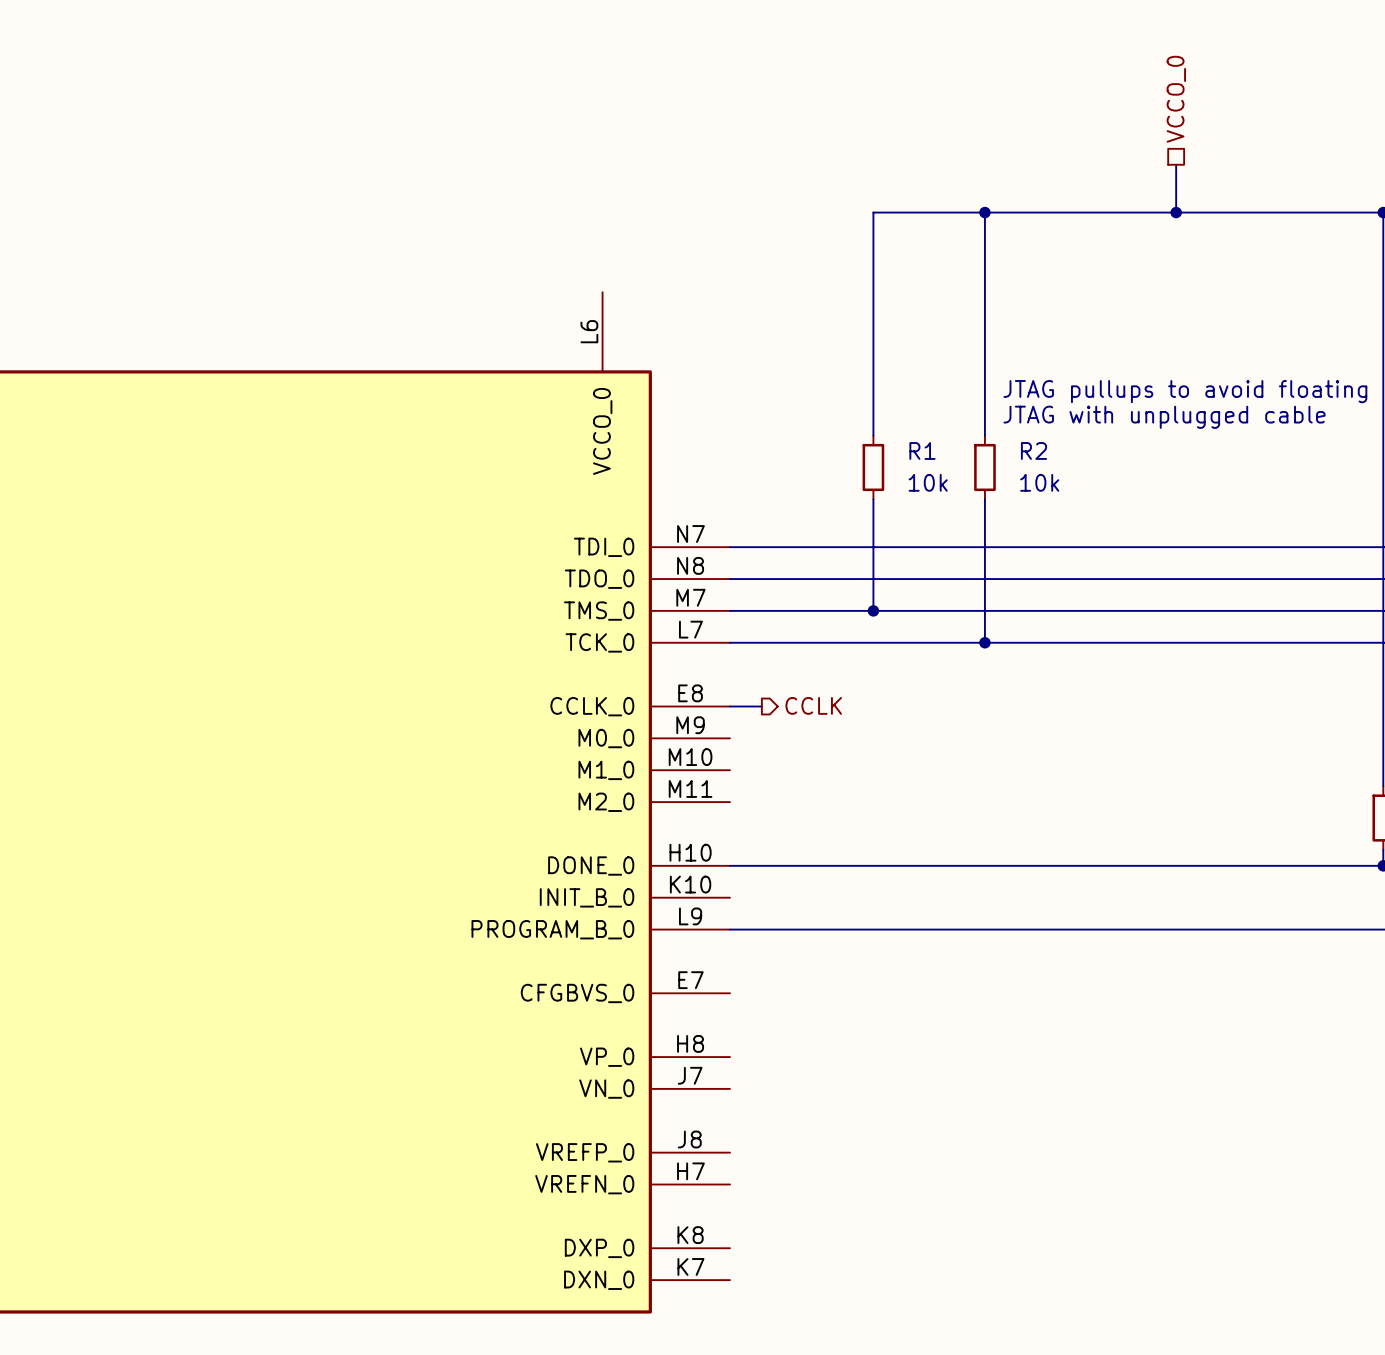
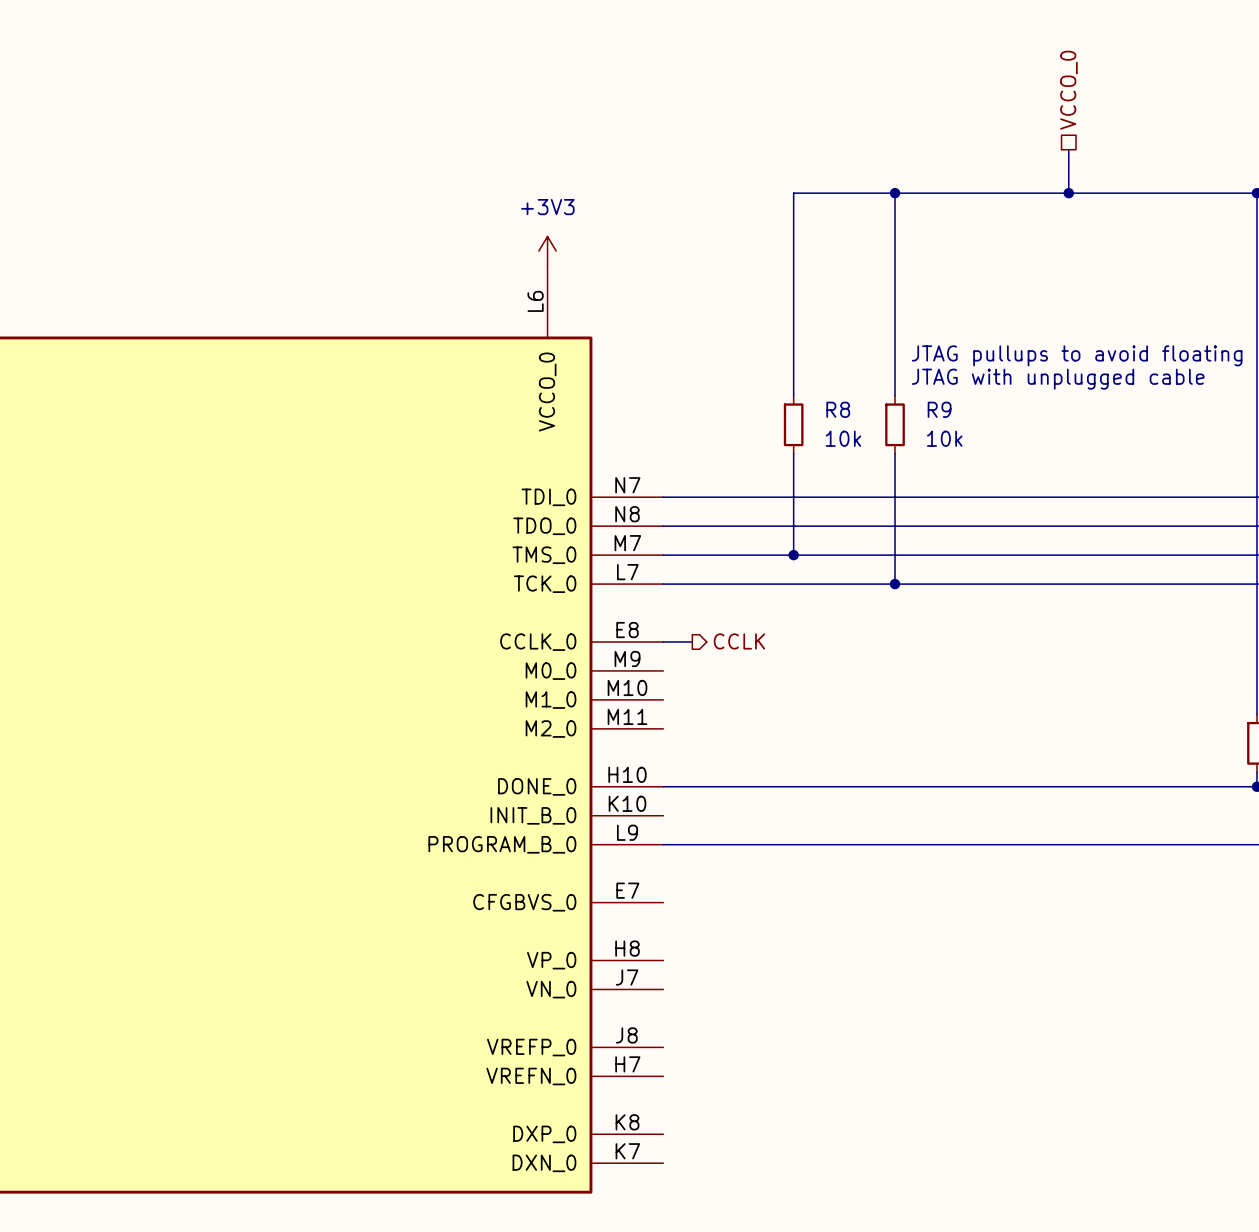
power symbol: none -> +3V3 (547, 251)
R1 name: R1 (922, 450) -> R8 (838, 409)
R2 name: R2 (1034, 450) -> R9 (939, 409)

